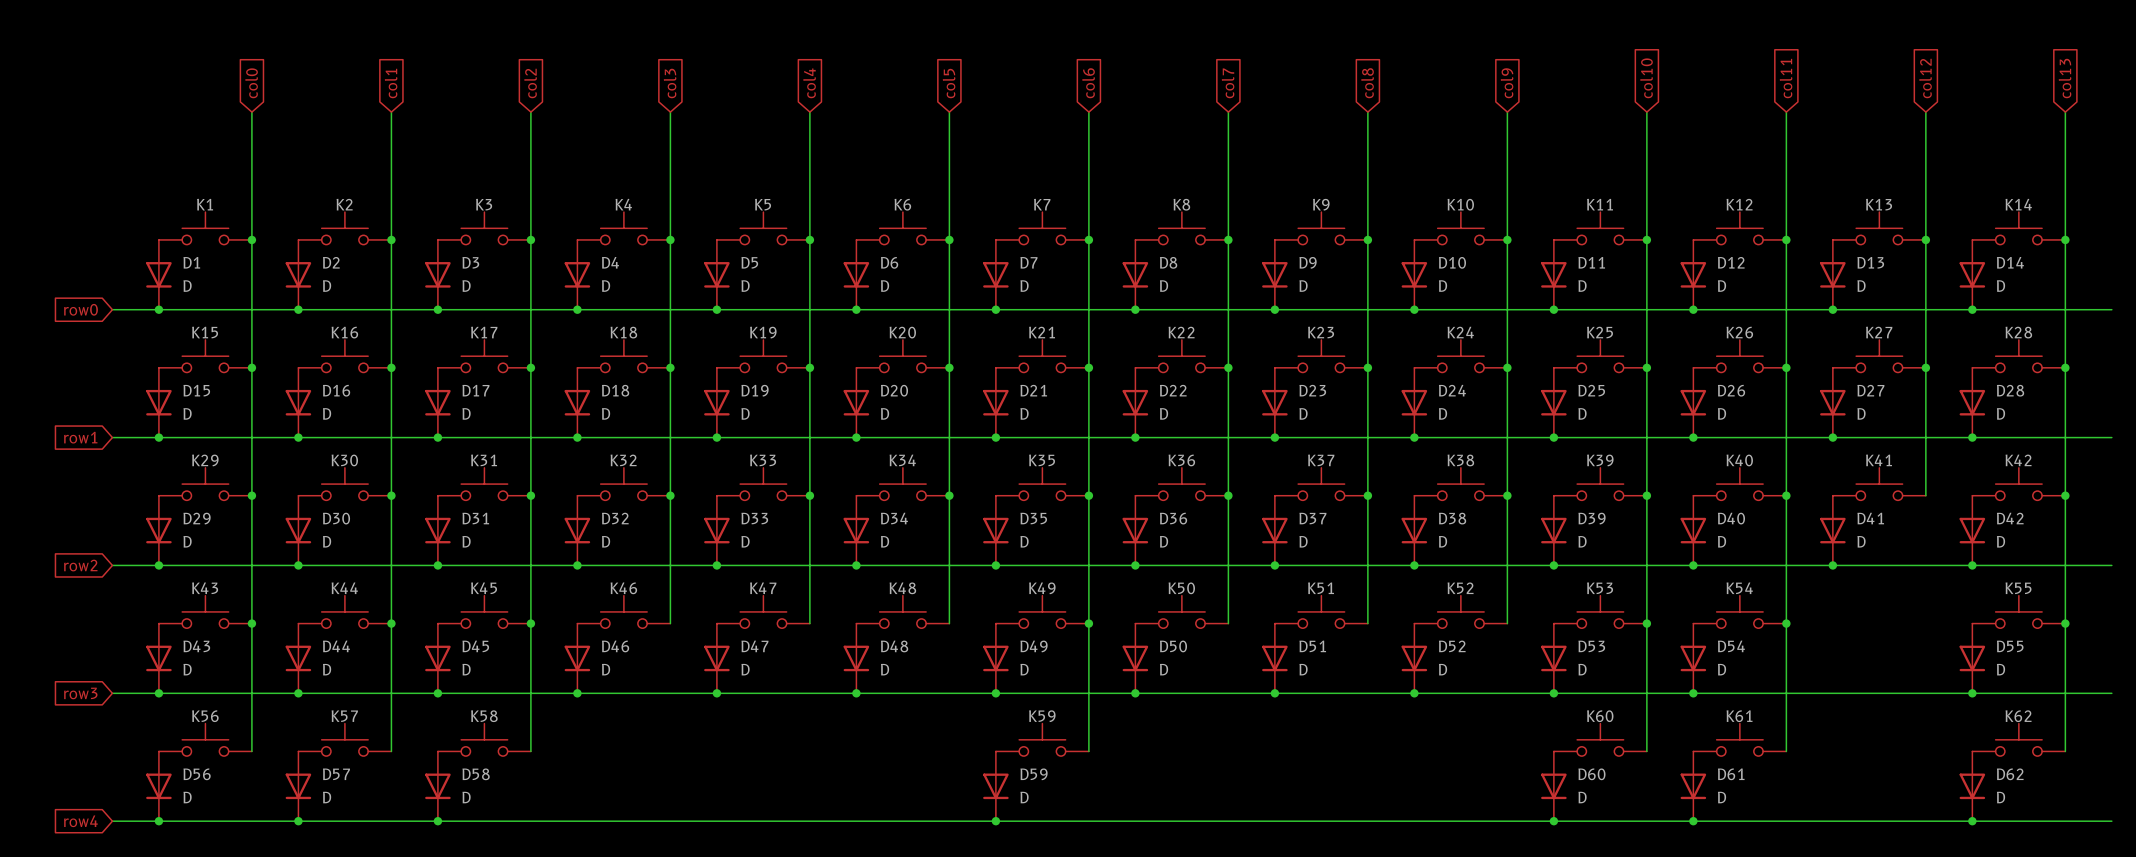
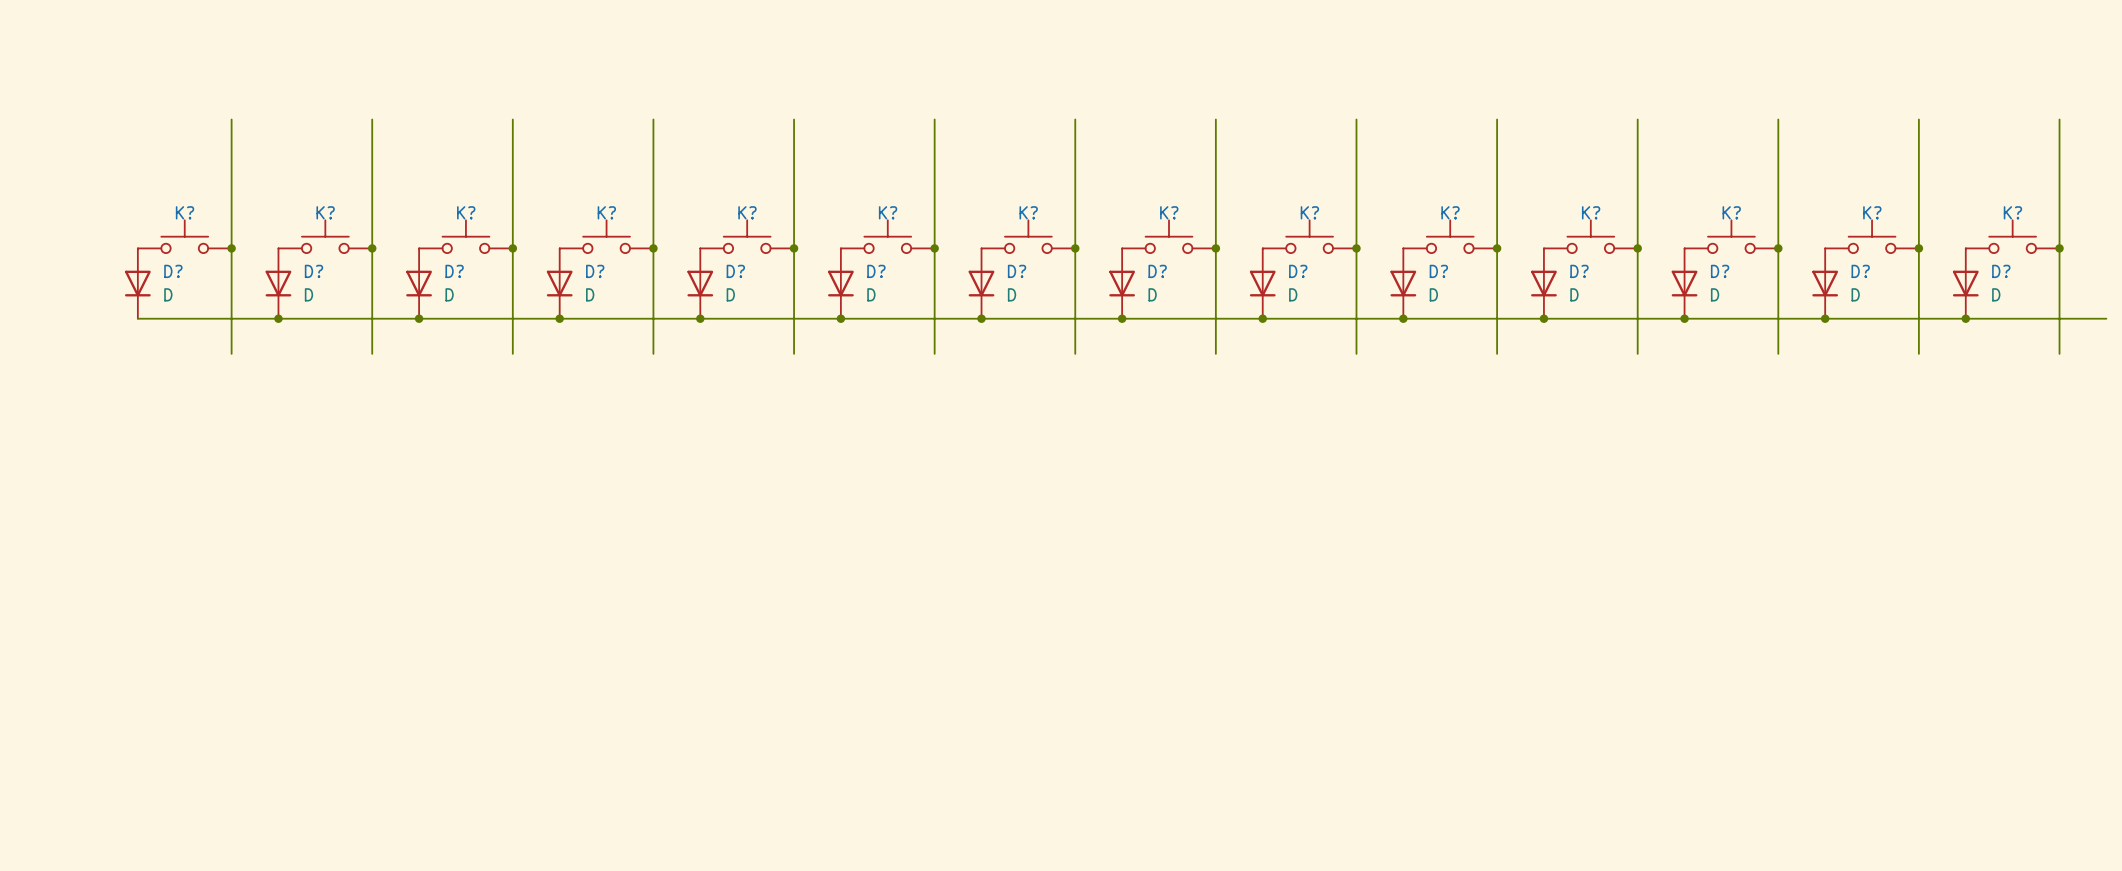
global label: col10 (1646, 78) -> none
global label: col11 (1786, 78) -> none
global label: col12 (1925, 78) -> none
global label: col13 (2065, 78) -> none
global label: col0 (251, 83) -> none
global label: col1 (391, 83) -> none
global label: col2 (530, 83) -> none
global label: col3 (670, 83) -> none
global label: col4 (809, 83) -> none
global label: col5 (949, 83) -> none
global label: col6 (1088, 83) -> none
global label: col7 (1228, 83) -> none
global label: col8 (1367, 83) -> none
global label: col9 (1507, 83) -> none
K1 name: K1 (205, 204) -> K? (185, 212)
K2 name: K2 (344, 204) -> K? (325, 212)
K3 name: K3 (484, 204) -> K? (466, 212)
K4 name: K4 (623, 204) -> K? (606, 212)
K5 name: K5 (763, 204) -> K? (747, 212)
K6 name: K6 (902, 204) -> K? (888, 212)
K7 name: K7 (1042, 204) -> K? (1028, 212)
K8 name: K8 (1181, 204) -> K? (1169, 212)
K9 name: K9 (1321, 204) -> K? (1309, 212)
K10 name: K10 (1460, 204) -> K? (1450, 212)
K11 name: K11 (1600, 204) -> K? (1591, 212)
K12 name: K12 (1739, 204) -> K? (1731, 212)
K13 name: K13 (1879, 204) -> K? (1872, 212)
K14 name: K14 (2018, 204) -> K? (2012, 212)
D1 name: D1 (191, 262) -> D? (173, 271)
D2 name: D2 (331, 262) -> D? (313, 271)
D3 name: D3 (470, 262) -> D? (454, 271)
D4 name: D4 (610, 262) -> D? (595, 271)
D5 name: D5 (749, 262) -> D? (735, 271)
D6 name: D6 (889, 262) -> D? (876, 271)
D7 name: D7 (1028, 262) -> D? (1017, 271)
D8 name: D8 (1168, 262) -> D? (1157, 271)
D9 name: D9 (1308, 262) -> D? (1298, 271)
D10 name: D10 (1452, 262) -> D? (1438, 271)
D11 name: D11 (1591, 262) -> D? (1579, 271)
D12 name: D12 (1731, 262) -> D? (1720, 271)
D13 name: D13 (1870, 262) -> D? (1860, 271)
D14 name: D14 (2010, 262) -> D? (2001, 271)
global label: row0 (81, 309) -> none
wire: (112, 309) (158, 309) -> none
junction: (158, 309) -> none
wire: (251, 344) (251, 751) -> none
wire: (391, 344) (391, 751) -> none
wire: (530, 344) (530, 751) -> none
wire: (670, 344) (670, 623) -> none
wire: (809, 344) (809, 623) -> none
wire: (949, 344) (949, 623) -> none
wire: (1088, 344) (1088, 751) -> none
wire: (1228, 344) (1228, 623) -> none
wire: (1367, 344) (1367, 623) -> none
wire: (1507, 344) (1507, 623) -> none
wire: (1646, 344) (1646, 751) -> none
wire: (1786, 344) (1786, 751) -> none
wire: (1925, 344) (1925, 495) -> none
wire: (2065, 344) (2065, 751) -> none
K15: (205, 356) -> none
K16: (344, 356) -> none
K17: (484, 356) -> none
K18: (623, 356) -> none
K19: (763, 356) -> none
K20: (902, 356) -> none
K21: (1042, 356) -> none
K22: (1181, 356) -> none
K23: (1321, 356) -> none
K24: (1460, 356) -> none
K25: (1600, 356) -> none
K26: (1739, 356) -> none
K27: (1879, 356) -> none
K28: (2018, 356) -> none
junction: (251, 367) -> none
junction: (391, 367) -> none
junction: (530, 367) -> none
junction: (670, 367) -> none
junction: (809, 367) -> none
junction: (949, 367) -> none
junction: (1088, 367) -> none
junction: (1228, 367) -> none
junction: (1367, 367) -> none
junction: (1507, 367) -> none
junction: (1646, 367) -> none
junction: (1786, 367) -> none
junction: (1925, 367) -> none
junction: (2065, 367) -> none
D15: D (158, 402) -> none
D16: D (298, 402) -> none
D17: D (437, 402) -> none
D18: D (577, 402) -> none
D19: D (716, 402) -> none
D20: D (856, 402) -> none
D21: D (995, 402) -> none
D22: D (1135, 402) -> none
D23: D (1274, 402) -> none
D24: D (1414, 402) -> none
D25: D (1553, 402) -> none
D26: D (1693, 402) -> none
D27: D (1832, 402) -> none
D28: D (1972, 402) -> none
global label: row1 (80, 437) -> none
wire: (112, 437) (2111, 437) -> none
junction: (158, 437) -> none
junction: (298, 437) -> none
junction: (437, 437) -> none
junction: (577, 437) -> none
junction: (716, 437) -> none
junction: (856, 437) -> none
junction: (995, 437) -> none
junction: (1135, 437) -> none
junction: (1274, 437) -> none
junction: (1414, 437) -> none
junction: (1553, 437) -> none
junction: (1693, 437) -> none
junction: (1832, 437) -> none
junction: (1972, 437) -> none
K29: (205, 484) -> none
K30: (344, 484) -> none
K31: (484, 484) -> none
K32: (623, 484) -> none
K33: (763, 484) -> none
K34: (902, 484) -> none
K35: (1042, 484) -> none
K36: (1181, 484) -> none
K37: (1321, 484) -> none
K38: (1460, 484) -> none
K39: (1600, 484) -> none
K40: (1739, 484) -> none
K41: (1879, 484) -> none
K42: (2018, 484) -> none
junction: (251, 495) -> none
junction: (391, 495) -> none
junction: (530, 495) -> none
junction: (670, 495) -> none
junction: (809, 495) -> none
junction: (949, 495) -> none
junction: (1088, 495) -> none
junction: (1228, 495) -> none
junction: (1367, 495) -> none
junction: (1507, 495) -> none
junction: (1646, 495) -> none
junction: (1786, 495) -> none
junction: (2065, 495) -> none
D29: D (158, 530) -> none
D30: D (298, 530) -> none
D31: D (437, 530) -> none
D32: D (577, 530) -> none
D33: D (716, 530) -> none
D34: D (856, 530) -> none
D35: D (995, 530) -> none
D36: D (1135, 530) -> none
D37: D (1274, 530) -> none
D38: D (1414, 530) -> none
D39: D (1553, 530) -> none
D40: D (1693, 530) -> none
D41: D (1832, 530) -> none
D42: D (1972, 530) -> none
global label: row2 (80, 565) -> none
wire: (112, 565) (2111, 565) -> none
junction: (158, 565) -> none
junction: (298, 565) -> none
junction: (437, 565) -> none
junction: (577, 565) -> none
junction: (716, 565) -> none
junction: (856, 565) -> none
junction: (995, 565) -> none
junction: (1135, 565) -> none
junction: (1274, 565) -> none
junction: (1414, 565) -> none
junction: (1553, 565) -> none
junction: (1693, 565) -> none
junction: (1832, 565) -> none
junction: (1972, 565) -> none
K43: (205, 611) -> none
K44: (344, 611) -> none
K45: (484, 611) -> none
K46: (623, 611) -> none
K47: (763, 611) -> none
K48: (902, 611) -> none
K49: (1042, 611) -> none
K50: (1181, 611) -> none
K51: (1321, 611) -> none
K52: (1460, 611) -> none
K53: (1600, 611) -> none
K54: (1739, 611) -> none
K55: (2018, 611) -> none
junction: (251, 623) -> none
junction: (391, 623) -> none
junction: (530, 623) -> none
junction: (1088, 623) -> none
junction: (1646, 623) -> none
junction: (1786, 623) -> none
junction: (2065, 623) -> none
D43: D (158, 658) -> none
D44: D (298, 658) -> none
D45: D (437, 658) -> none
D46: D (577, 658) -> none
D47: D (716, 658) -> none
D48: D (856, 658) -> none
D49: D (995, 658) -> none
D50: D (1135, 658) -> none
D51: D (1274, 658) -> none
D52: D (1414, 658) -> none
D53: D (1553, 658) -> none
D54: D (1693, 658) -> none
D55: D (1972, 658) -> none
global label: row3 (80, 693) -> none
wire: (112, 693) (2111, 693) -> none
junction: (158, 693) -> none
junction: (298, 693) -> none
junction: (437, 693) -> none
junction: (577, 693) -> none
junction: (716, 693) -> none
junction: (856, 693) -> none
junction: (995, 693) -> none
junction: (1135, 693) -> none
junction: (1274, 693) -> none
junction: (1414, 693) -> none
junction: (1553, 693) -> none
junction: (1693, 693) -> none
junction: (1972, 693) -> none
K56: (205, 739) -> none
K57: (344, 739) -> none
K58: (484, 739) -> none
K59: (1042, 739) -> none
K60: (1600, 739) -> none
K61: (1739, 739) -> none
K62: (2018, 739) -> none
D56: D (158, 786) -> none
D57: D (298, 786) -> none
D58: D (437, 786) -> none
D59: D (995, 786) -> none
D60: D (1553, 786) -> none
D61: D (1693, 786) -> none
D62: D (1972, 786) -> none
global label: row4 (80, 821) -> none
wire: (112, 821) (2111, 821) -> none
junction: (158, 821) -> none
junction: (298, 821) -> none
junction: (437, 821) -> none
junction: (995, 821) -> none
junction: (1553, 821) -> none
junction: (1693, 821) -> none
junction: (1972, 821) -> none

